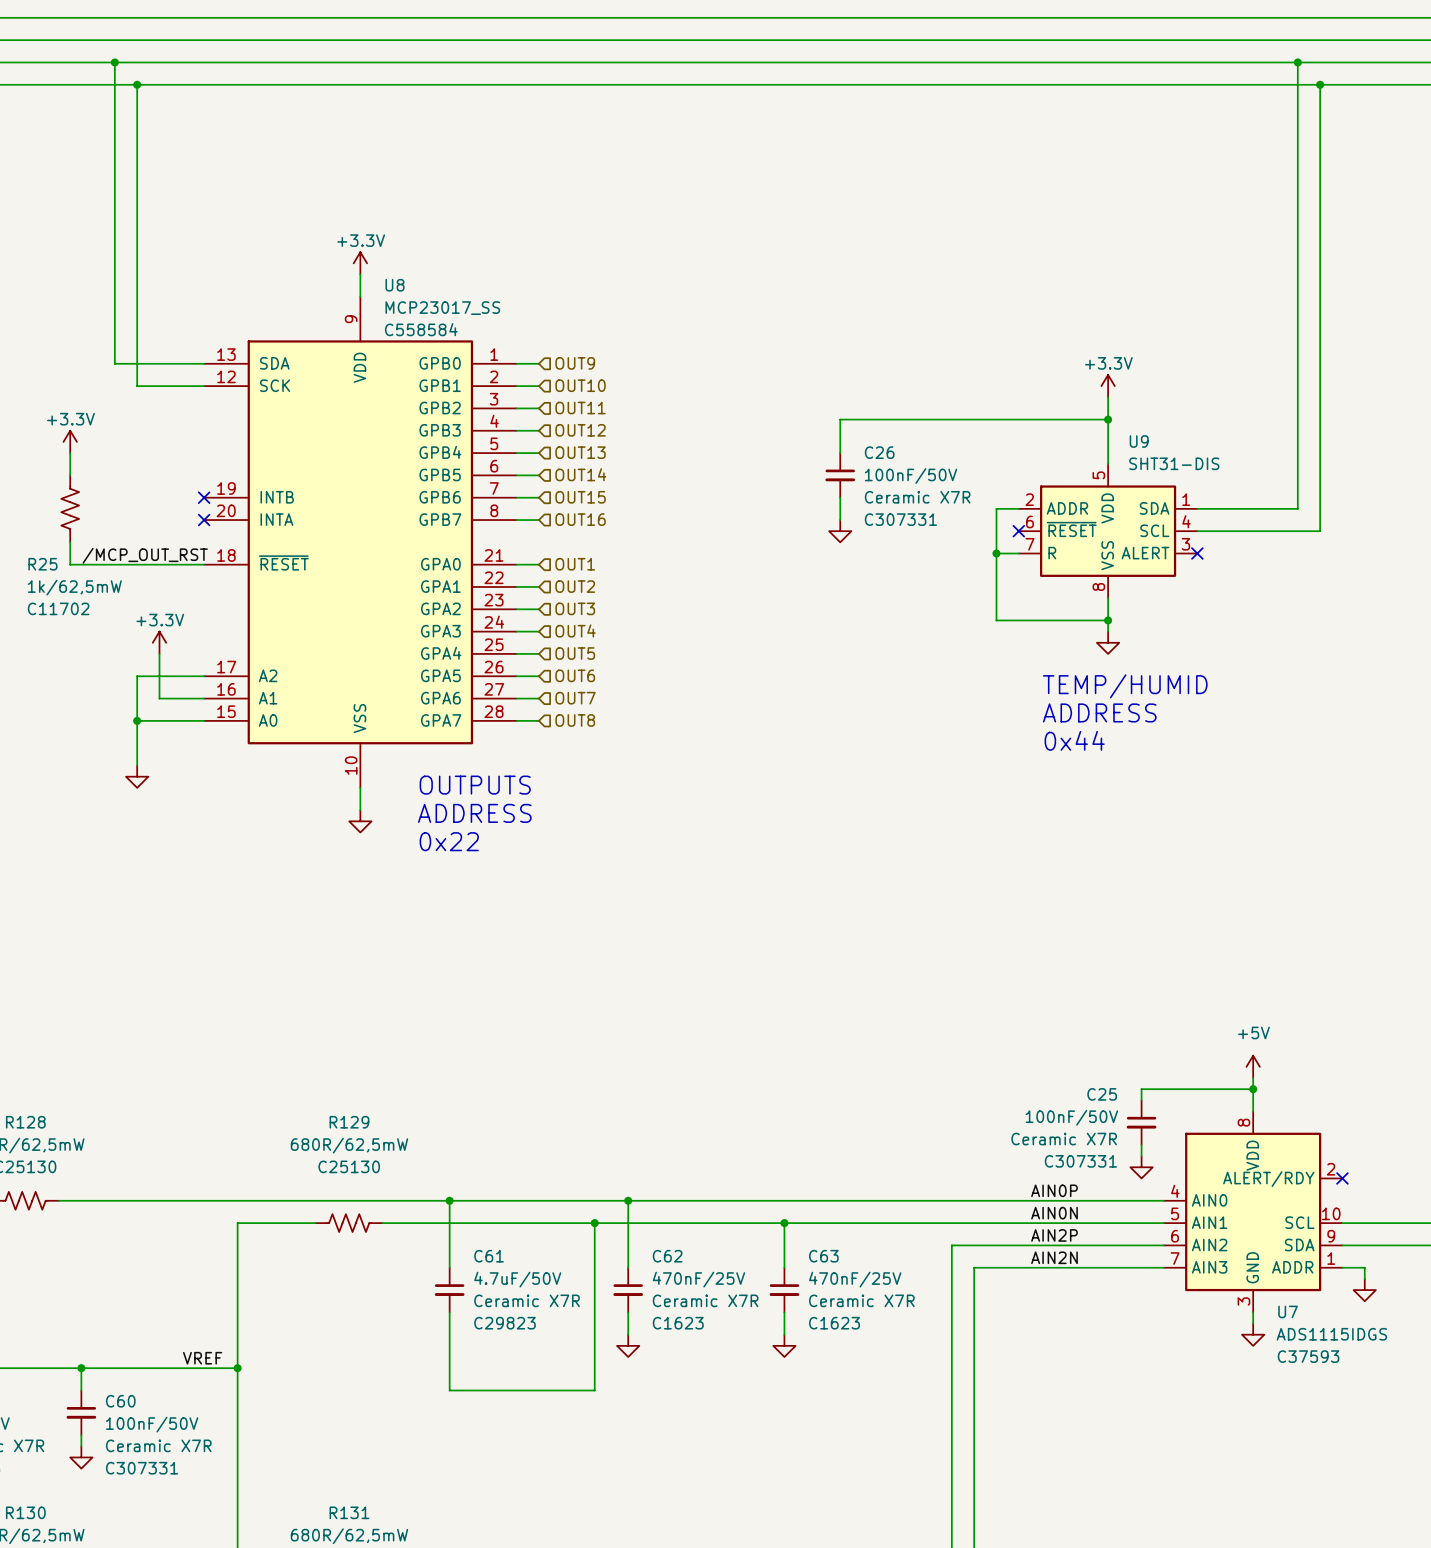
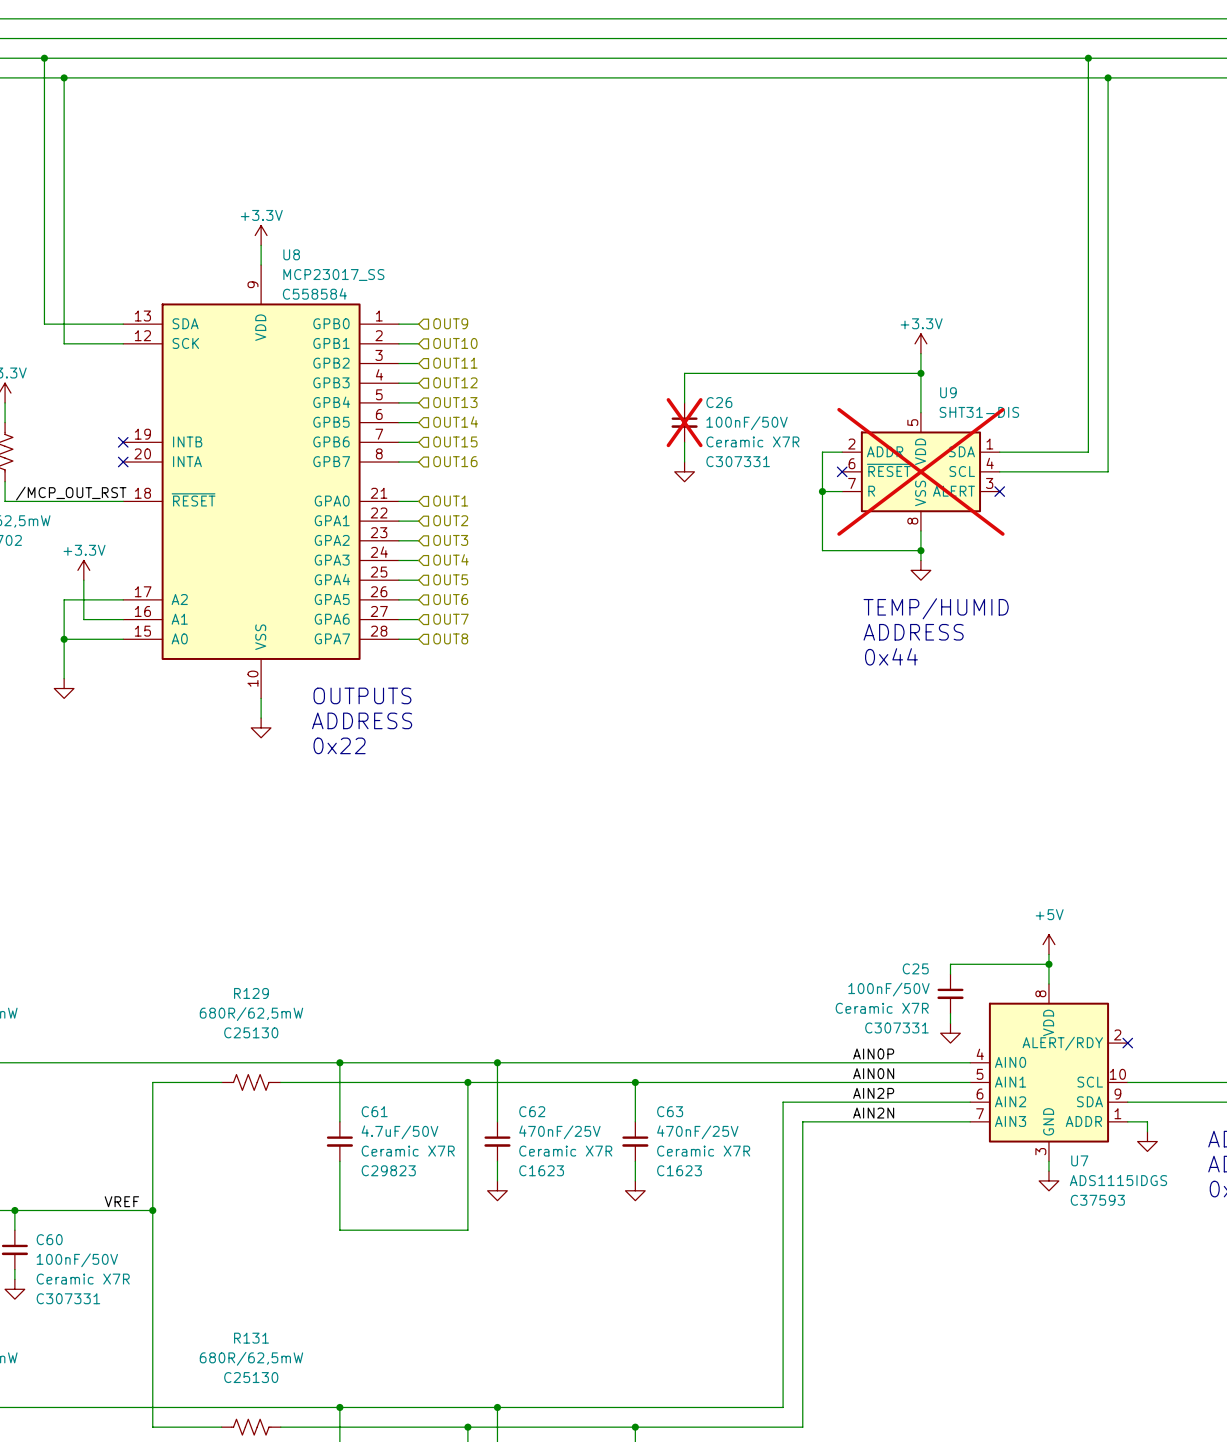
C26 do-not-place cross: none -> (684, 422)
U9 do-not-place cross: none -> (920, 471)

